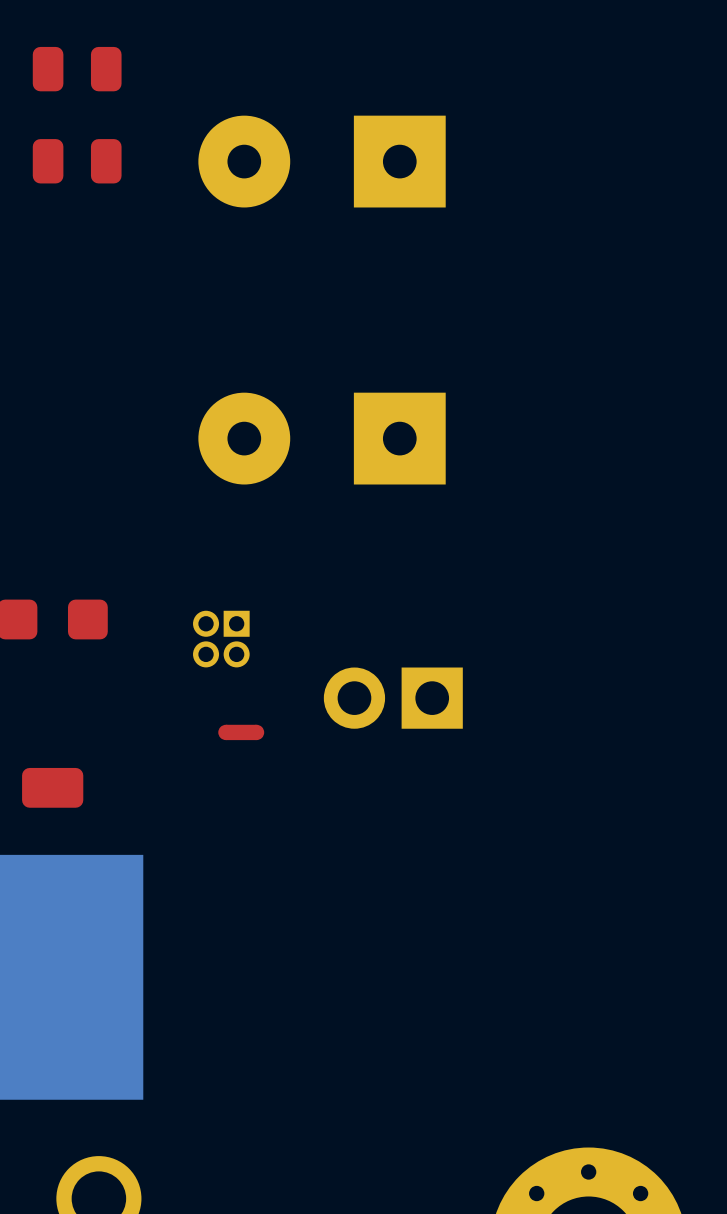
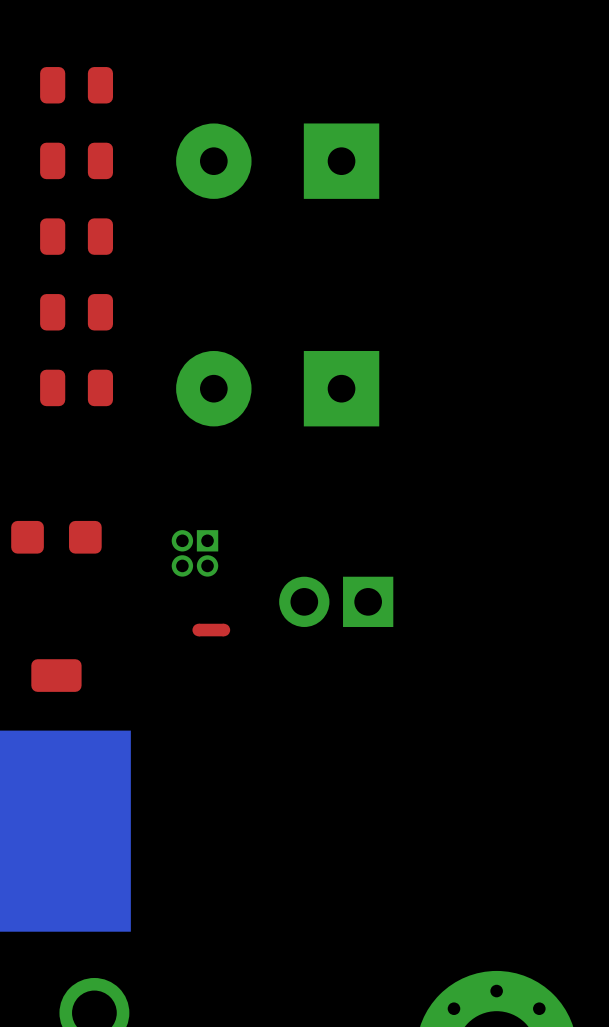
part: none -> (76, 236)
part: none -> (76, 312)
part: none -> (76, 387)

